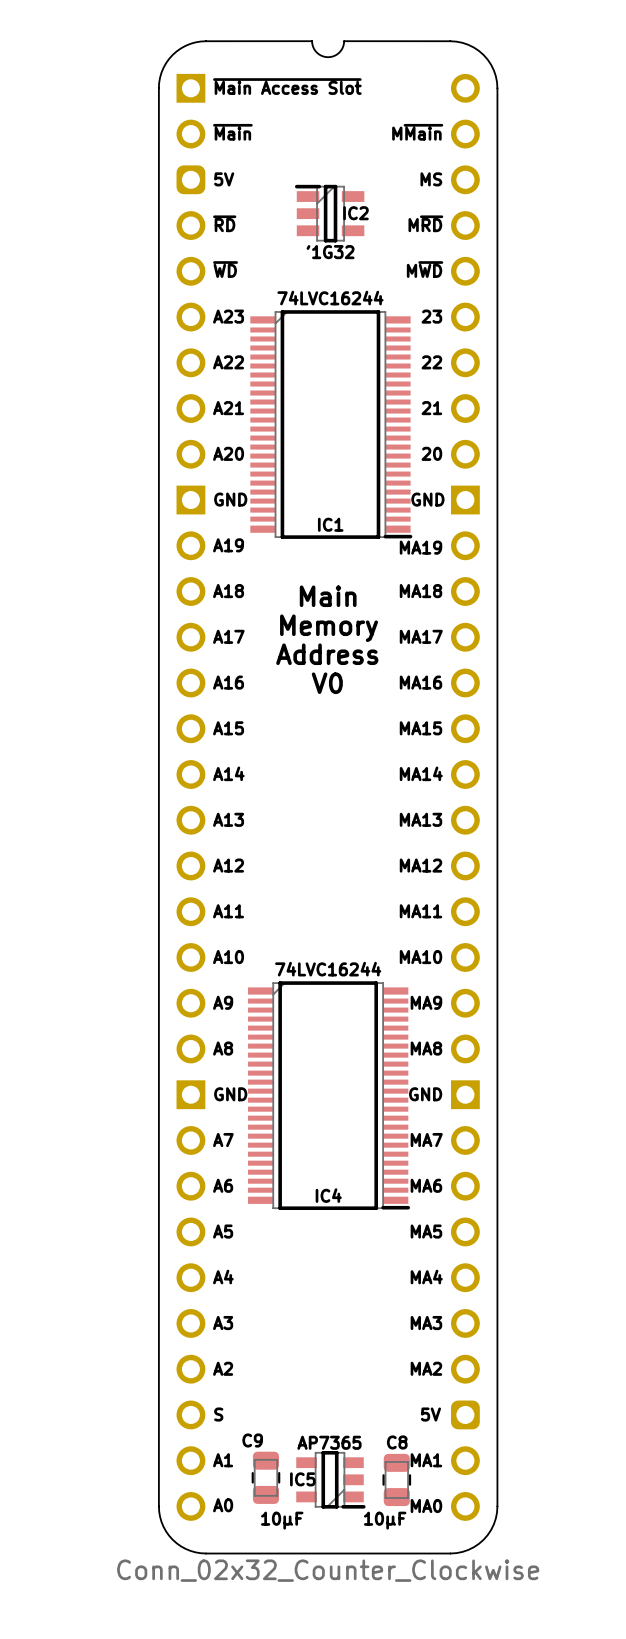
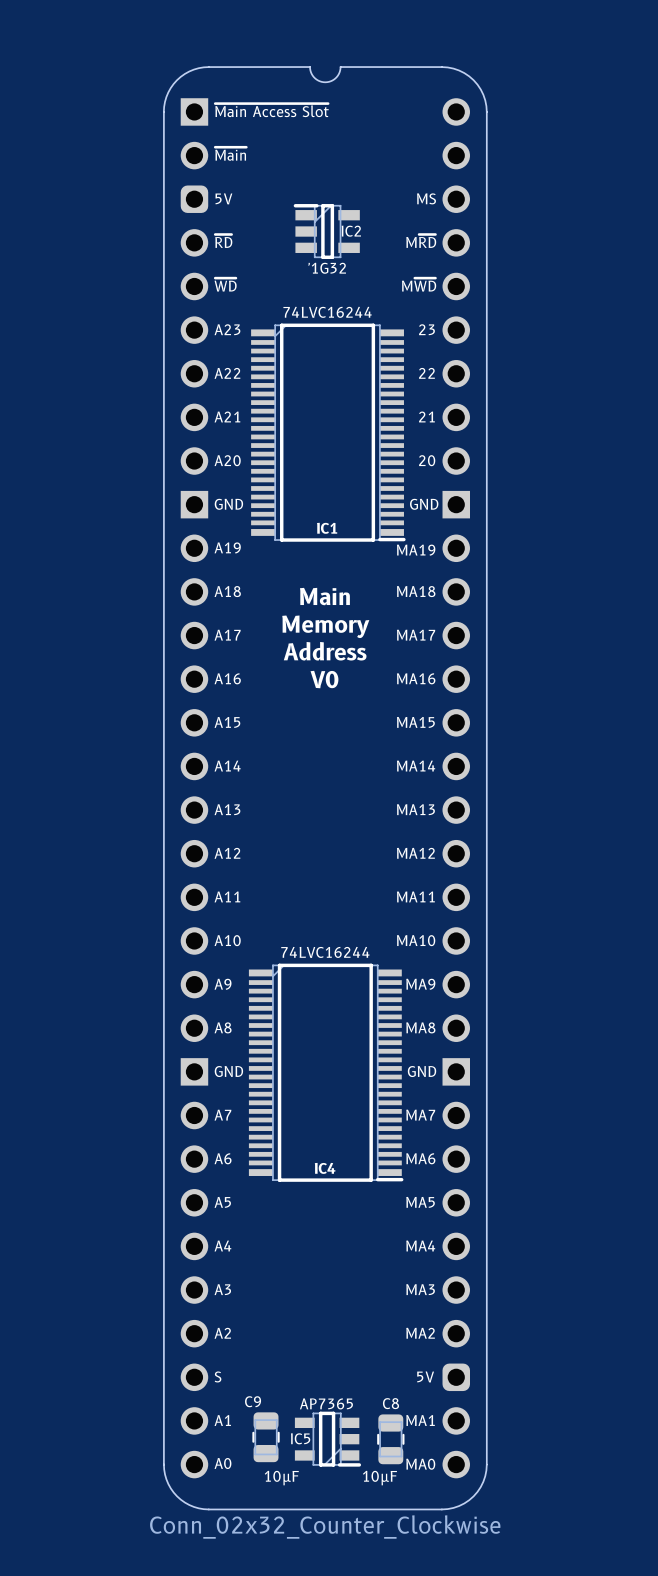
text: M~{Main} (417, 132) -> none

